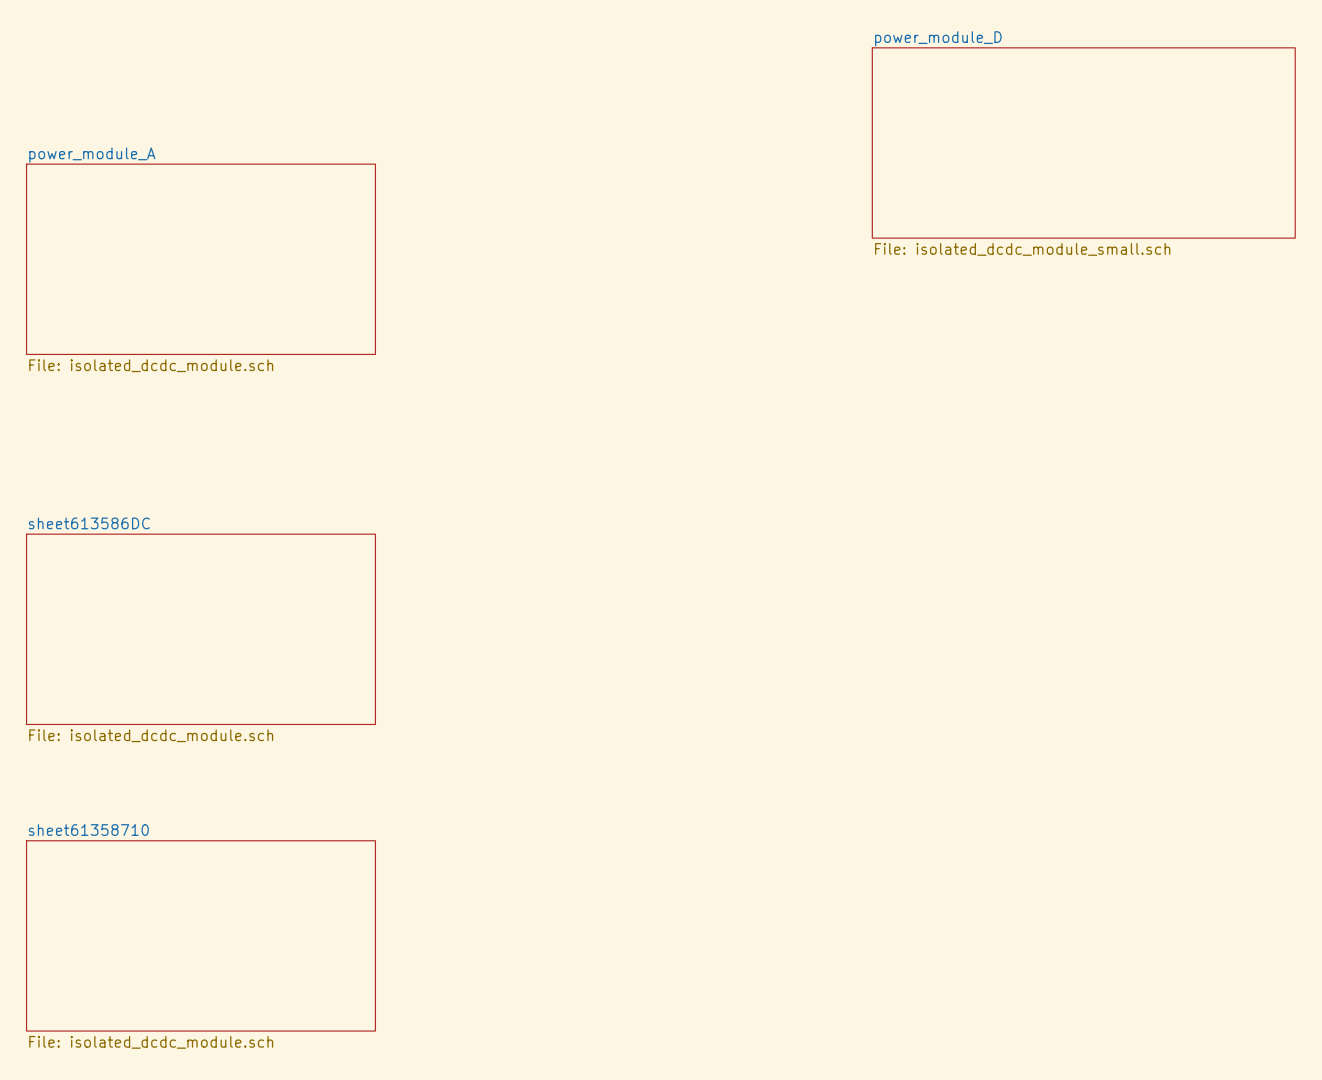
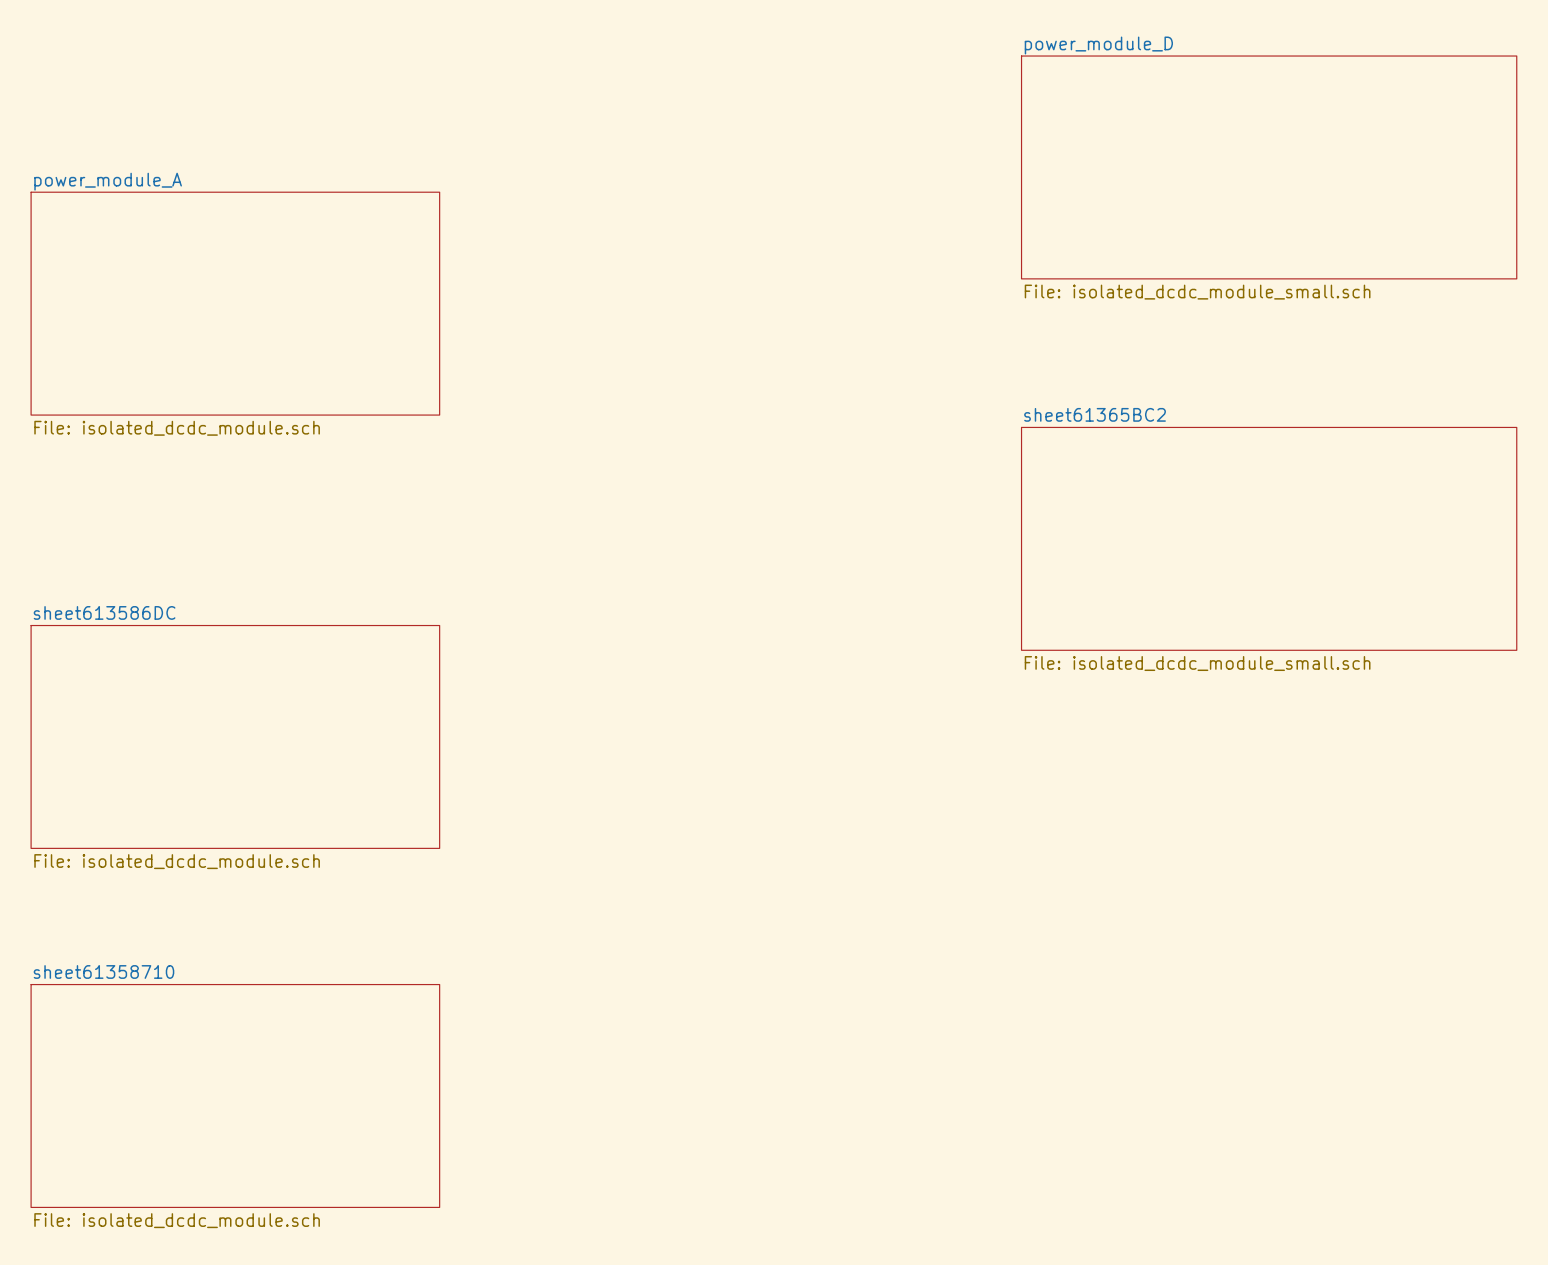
sheet sheet61365BC2: none -> File: isolated_dcdc_module_small.sch (1269, 538)

